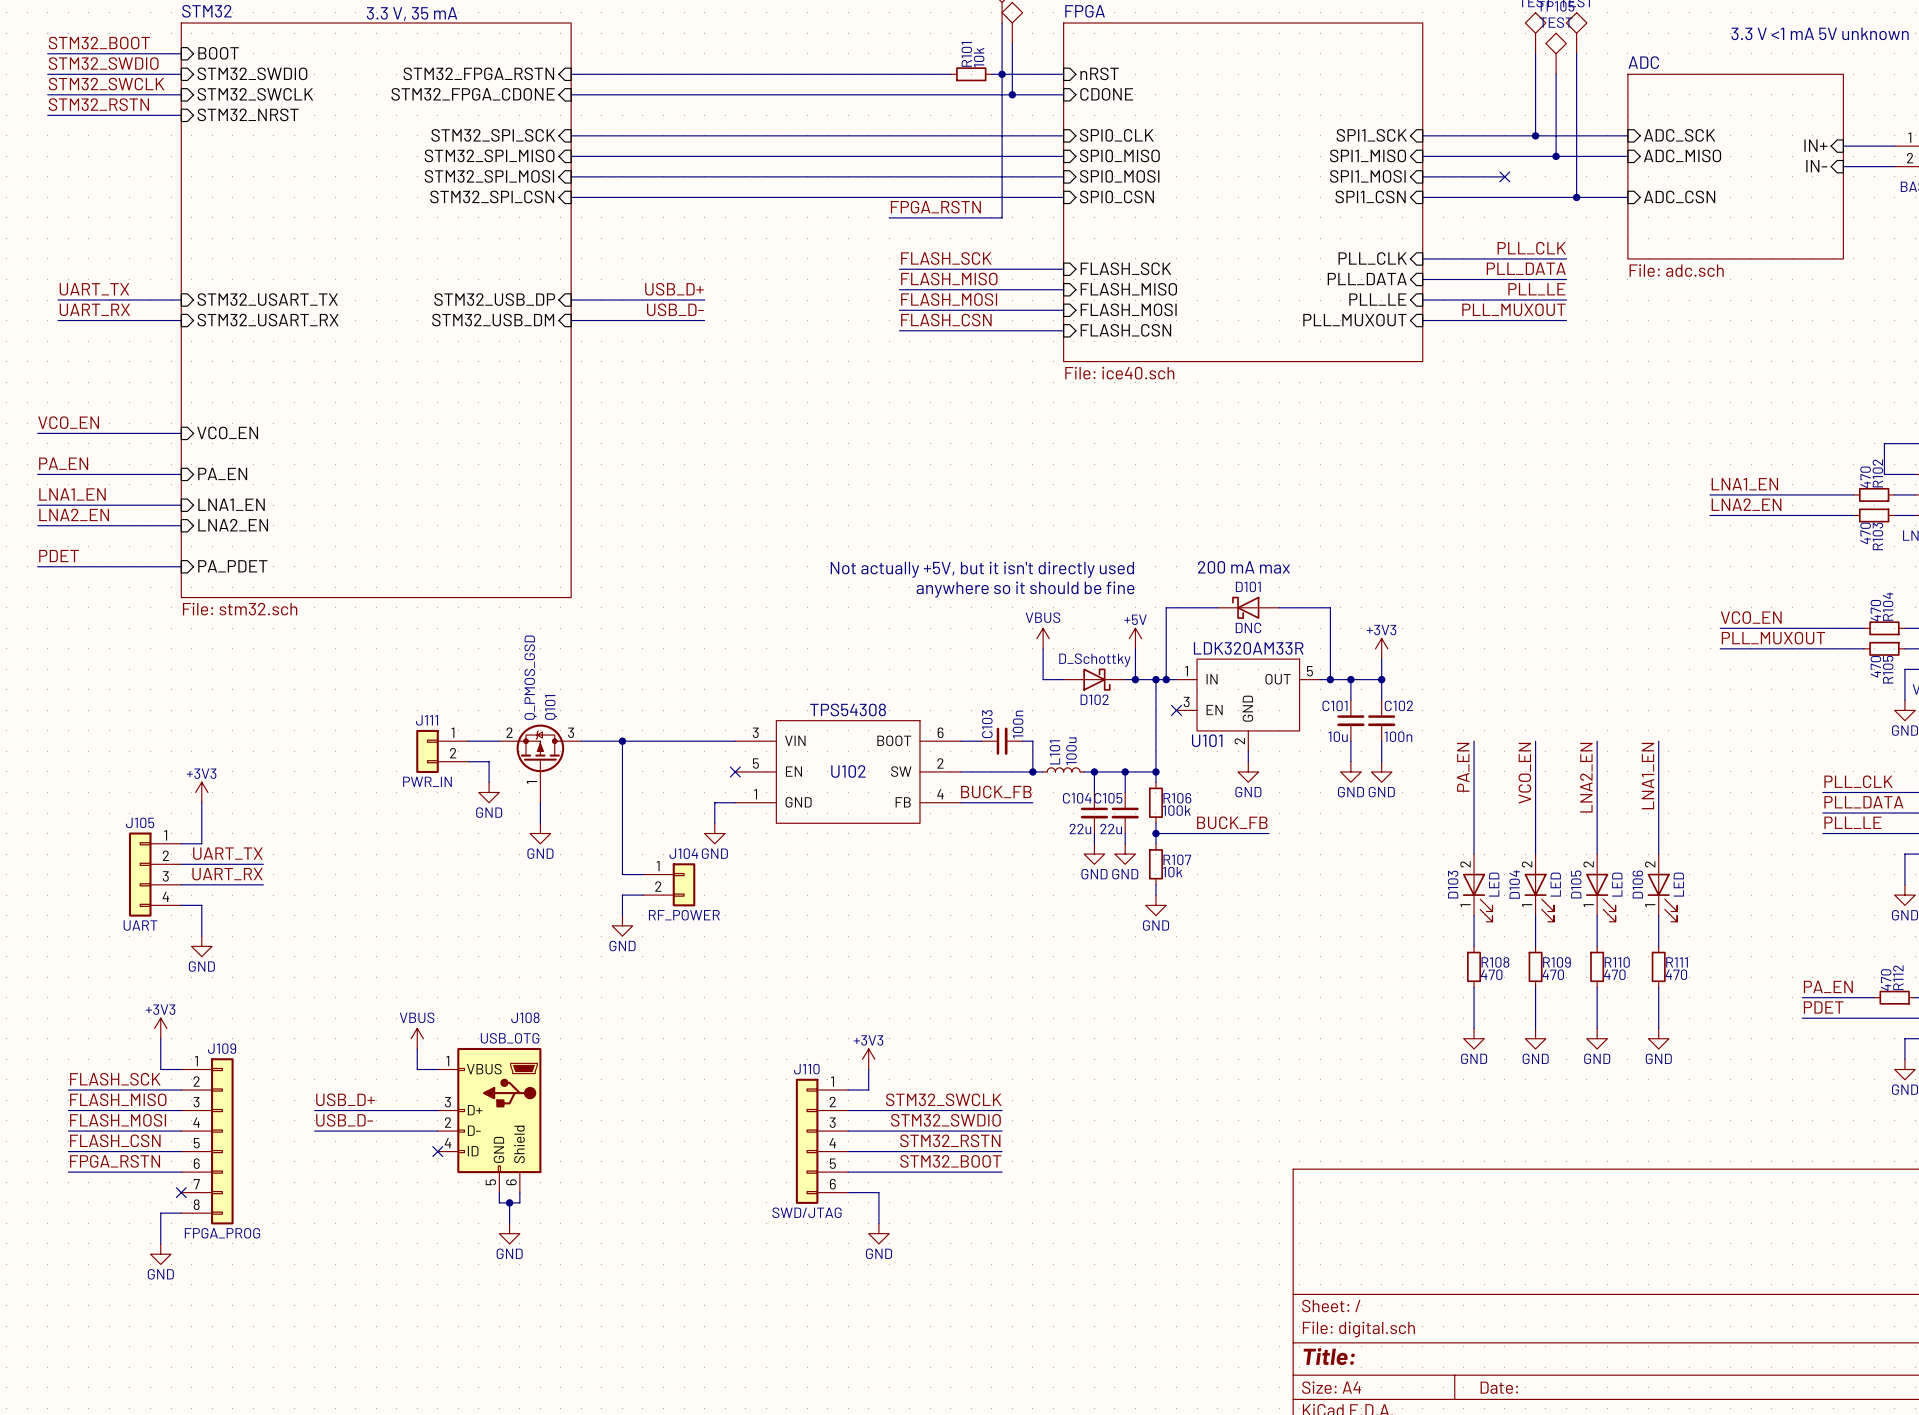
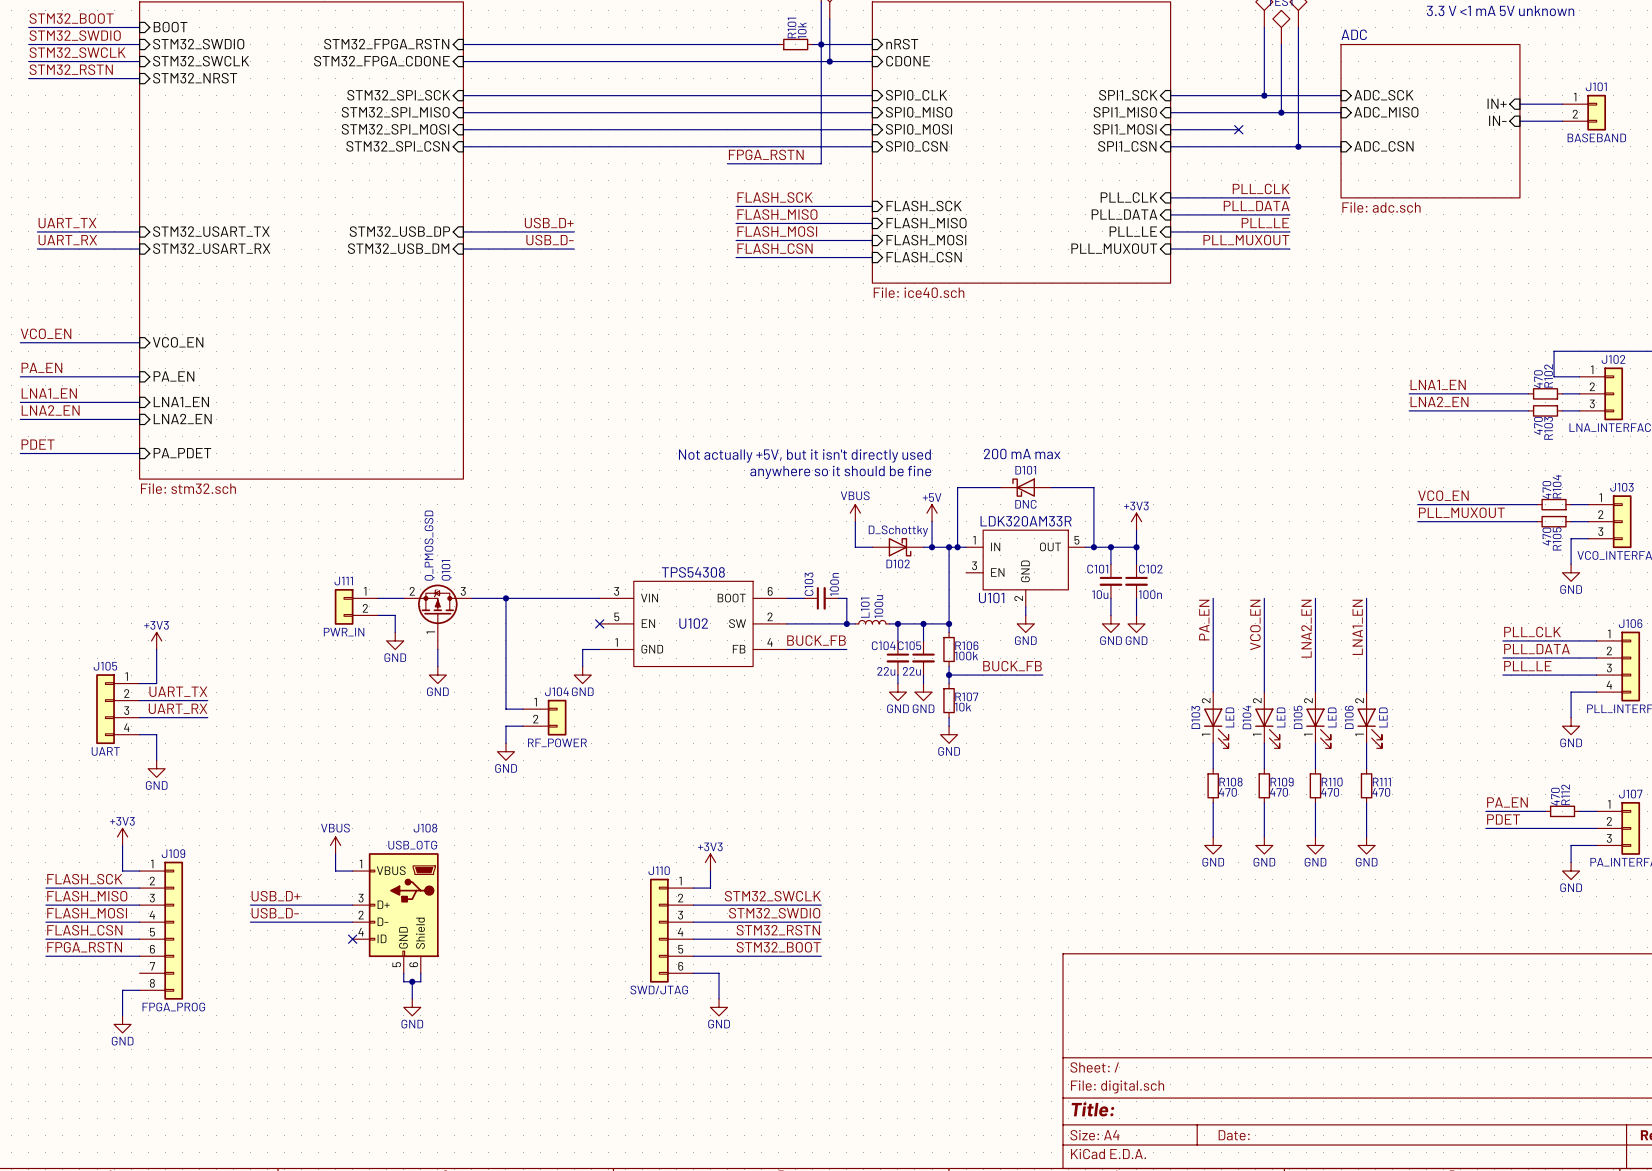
no-connect mark: (1176, 710) -> none
no-connect mark: (181, 1192) -> none

